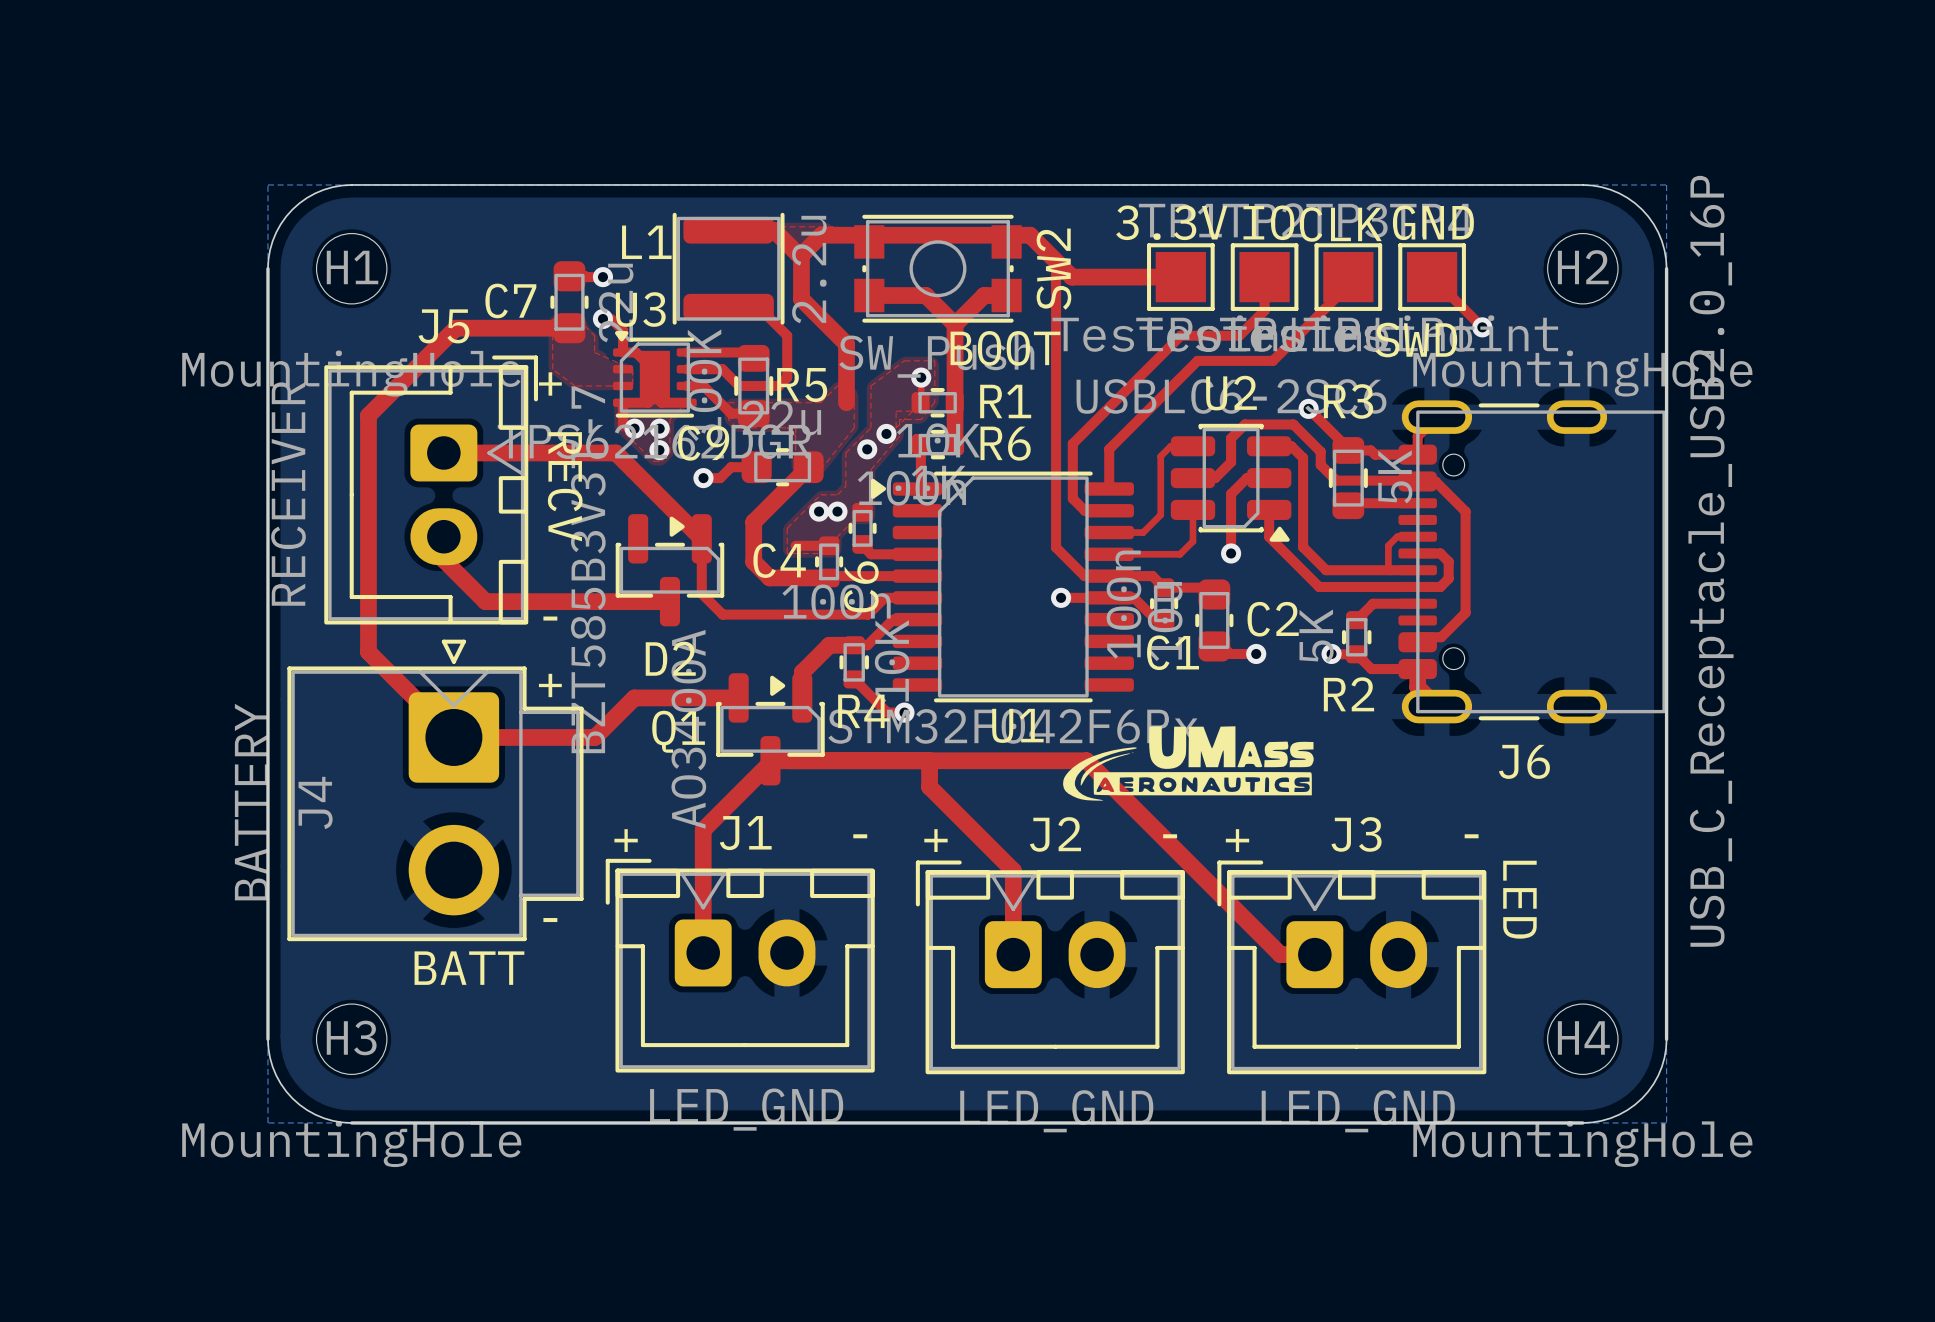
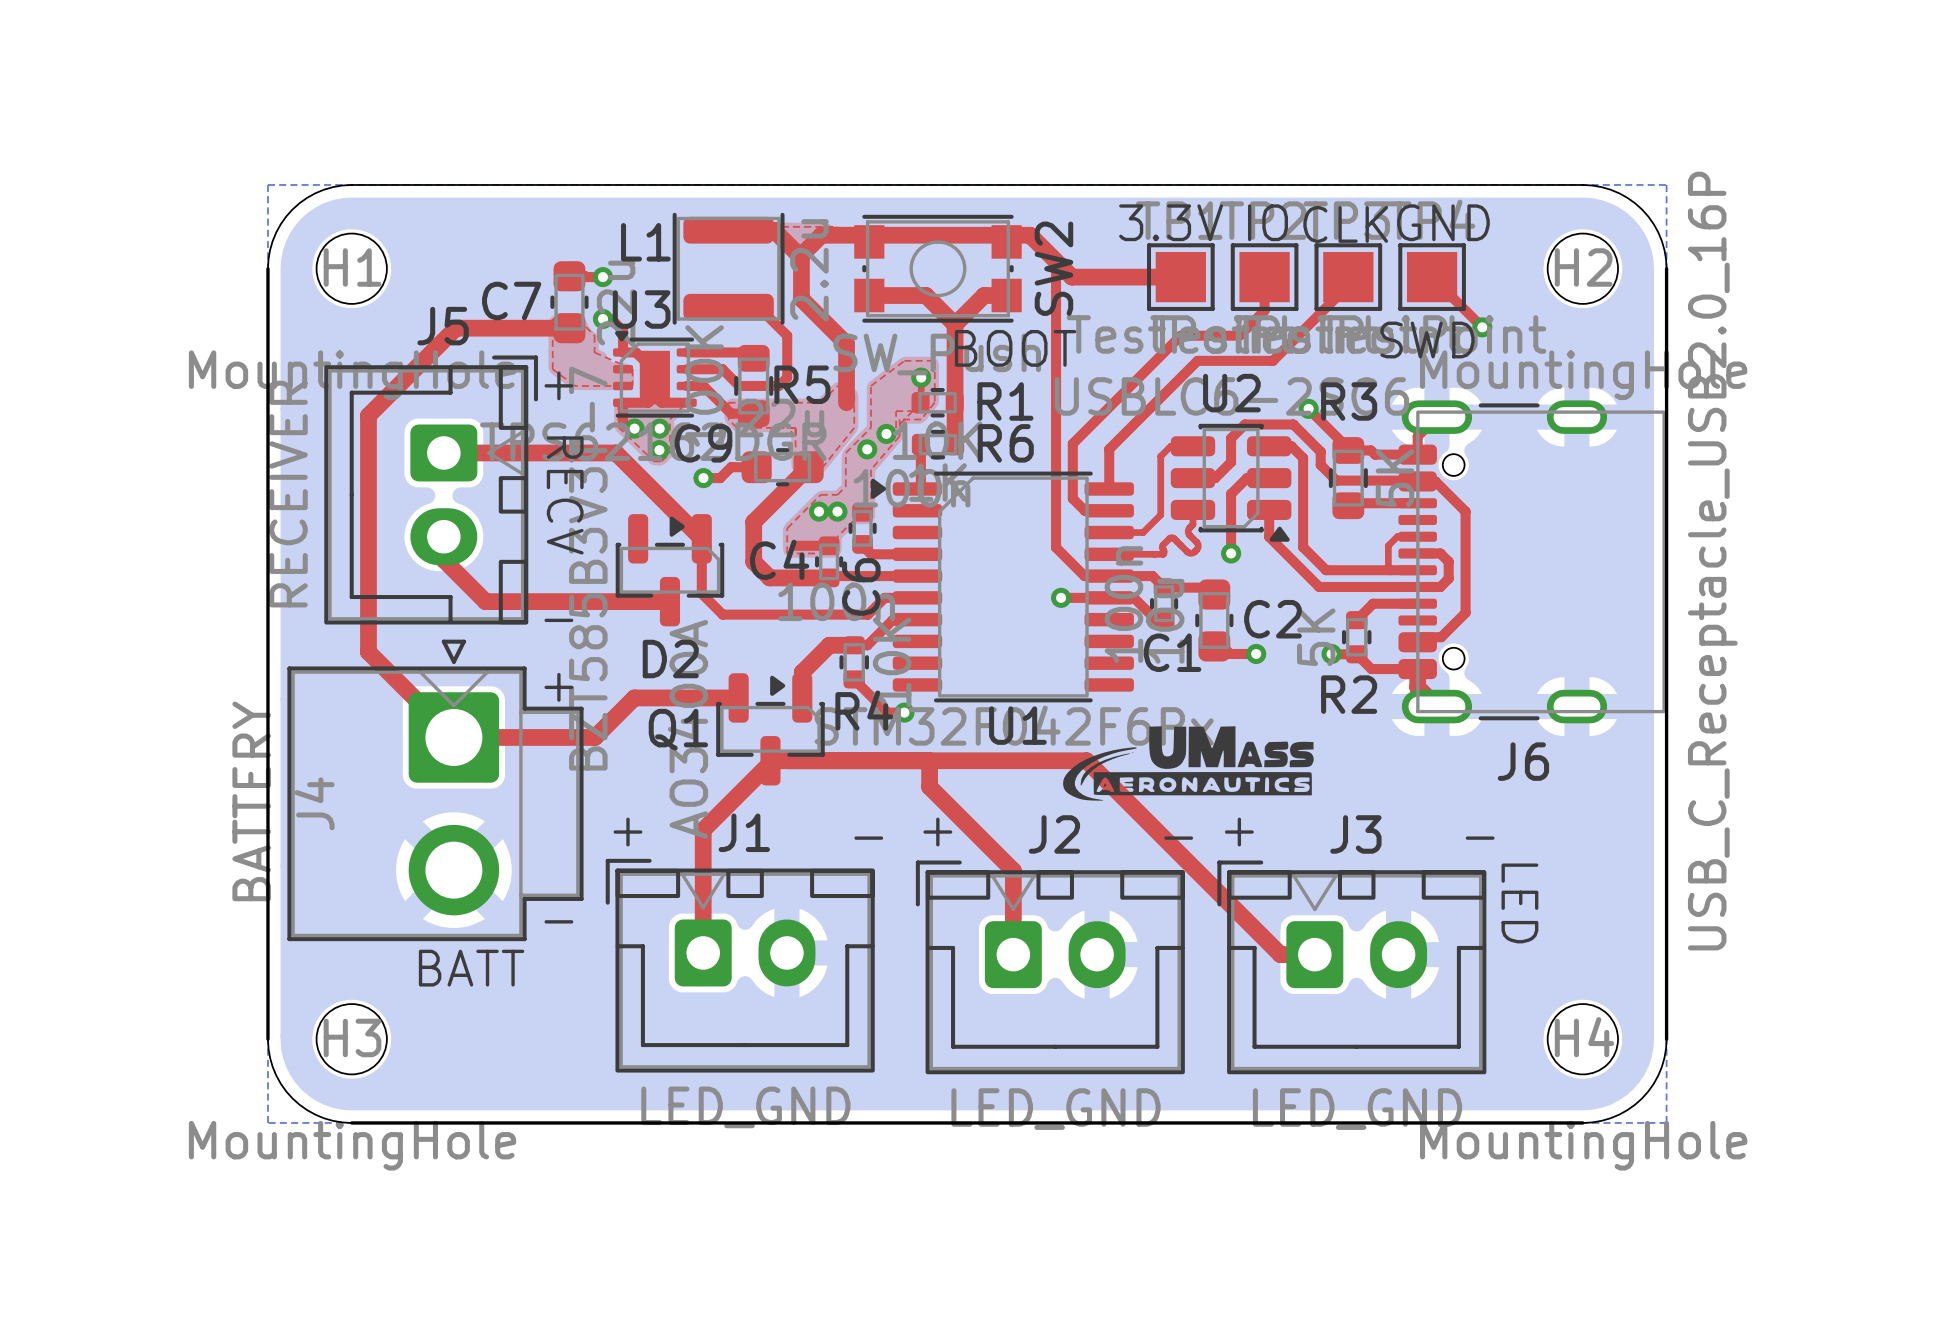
top track: (1192, 524) (1192, 541) (1180, 554) (1163, 554) -> (1192, 524) (1188, 532) (1197, 544) (1194, 551) (1188, 552) (1171, 537) (1162, 545) (1163, 554)

